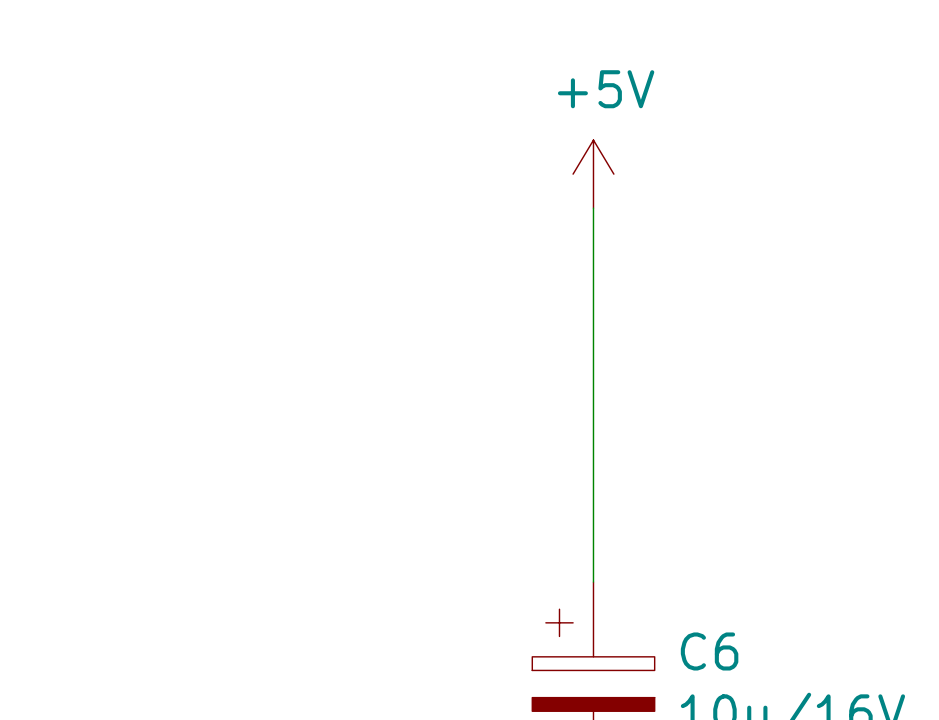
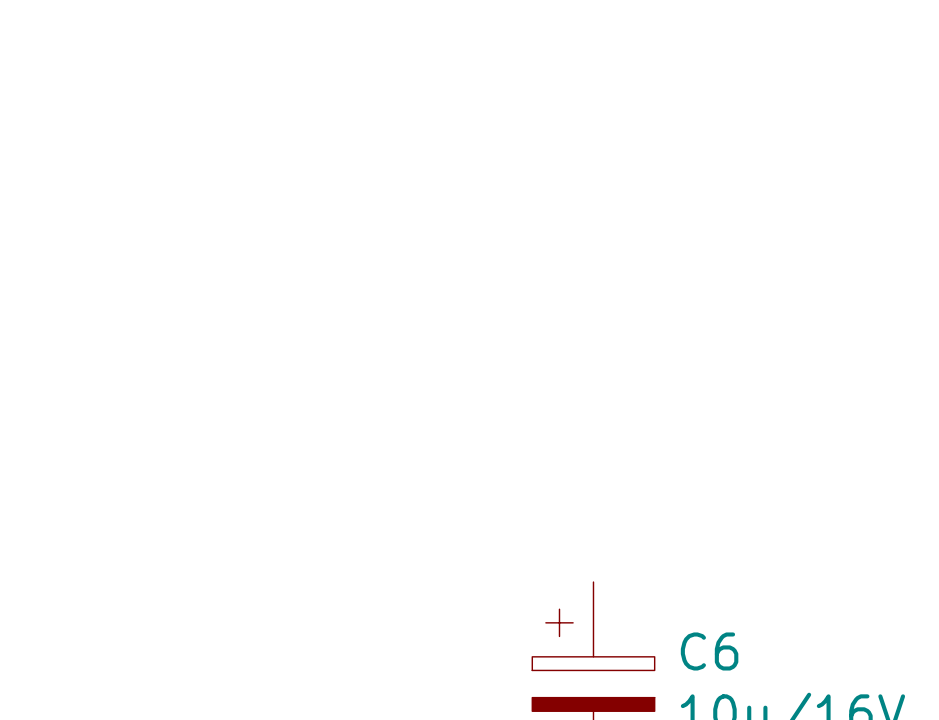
power symbol: +5V (593, 174) -> none
wire: (593, 208) (593, 582) -> none

